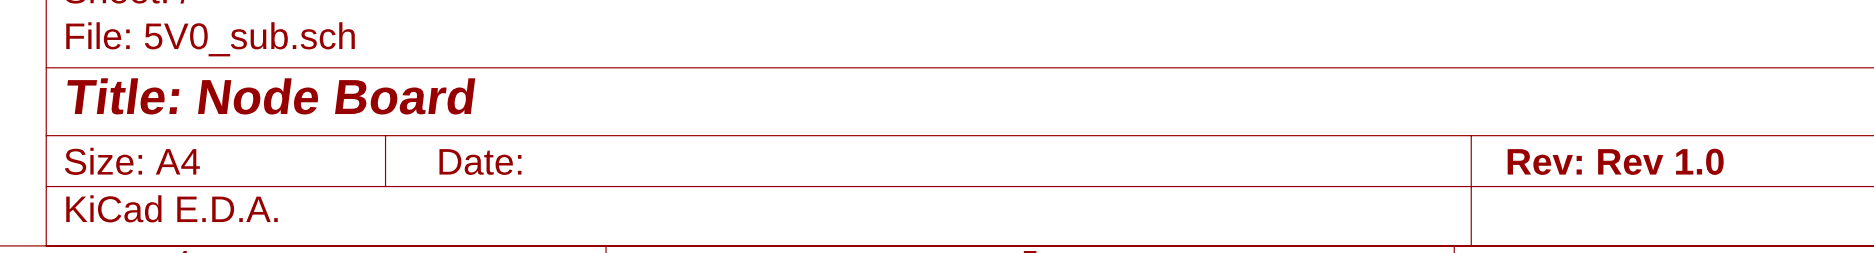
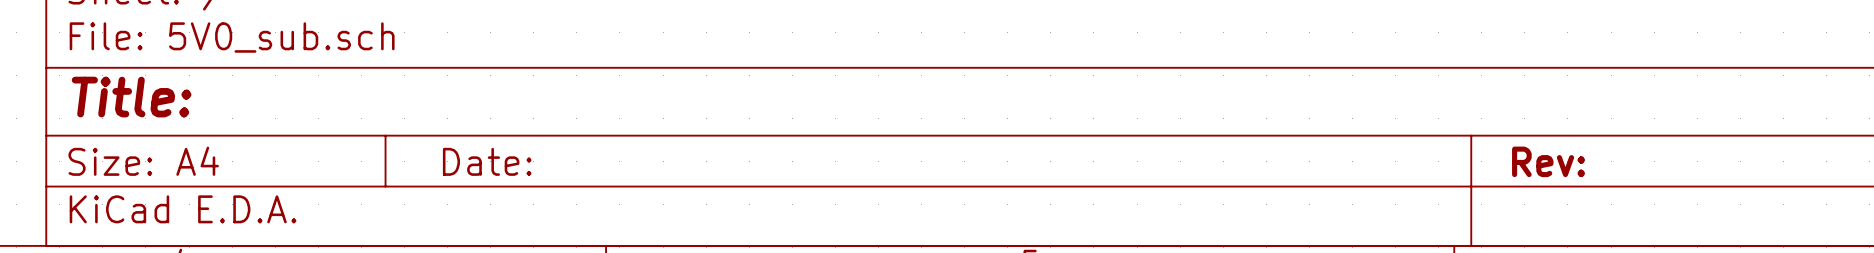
title block: Title: Node Board (271, 96) -> Title: (131, 97)
title block: Rev: Rev 1.0 (1615, 161) -> Rev: (1548, 161)

